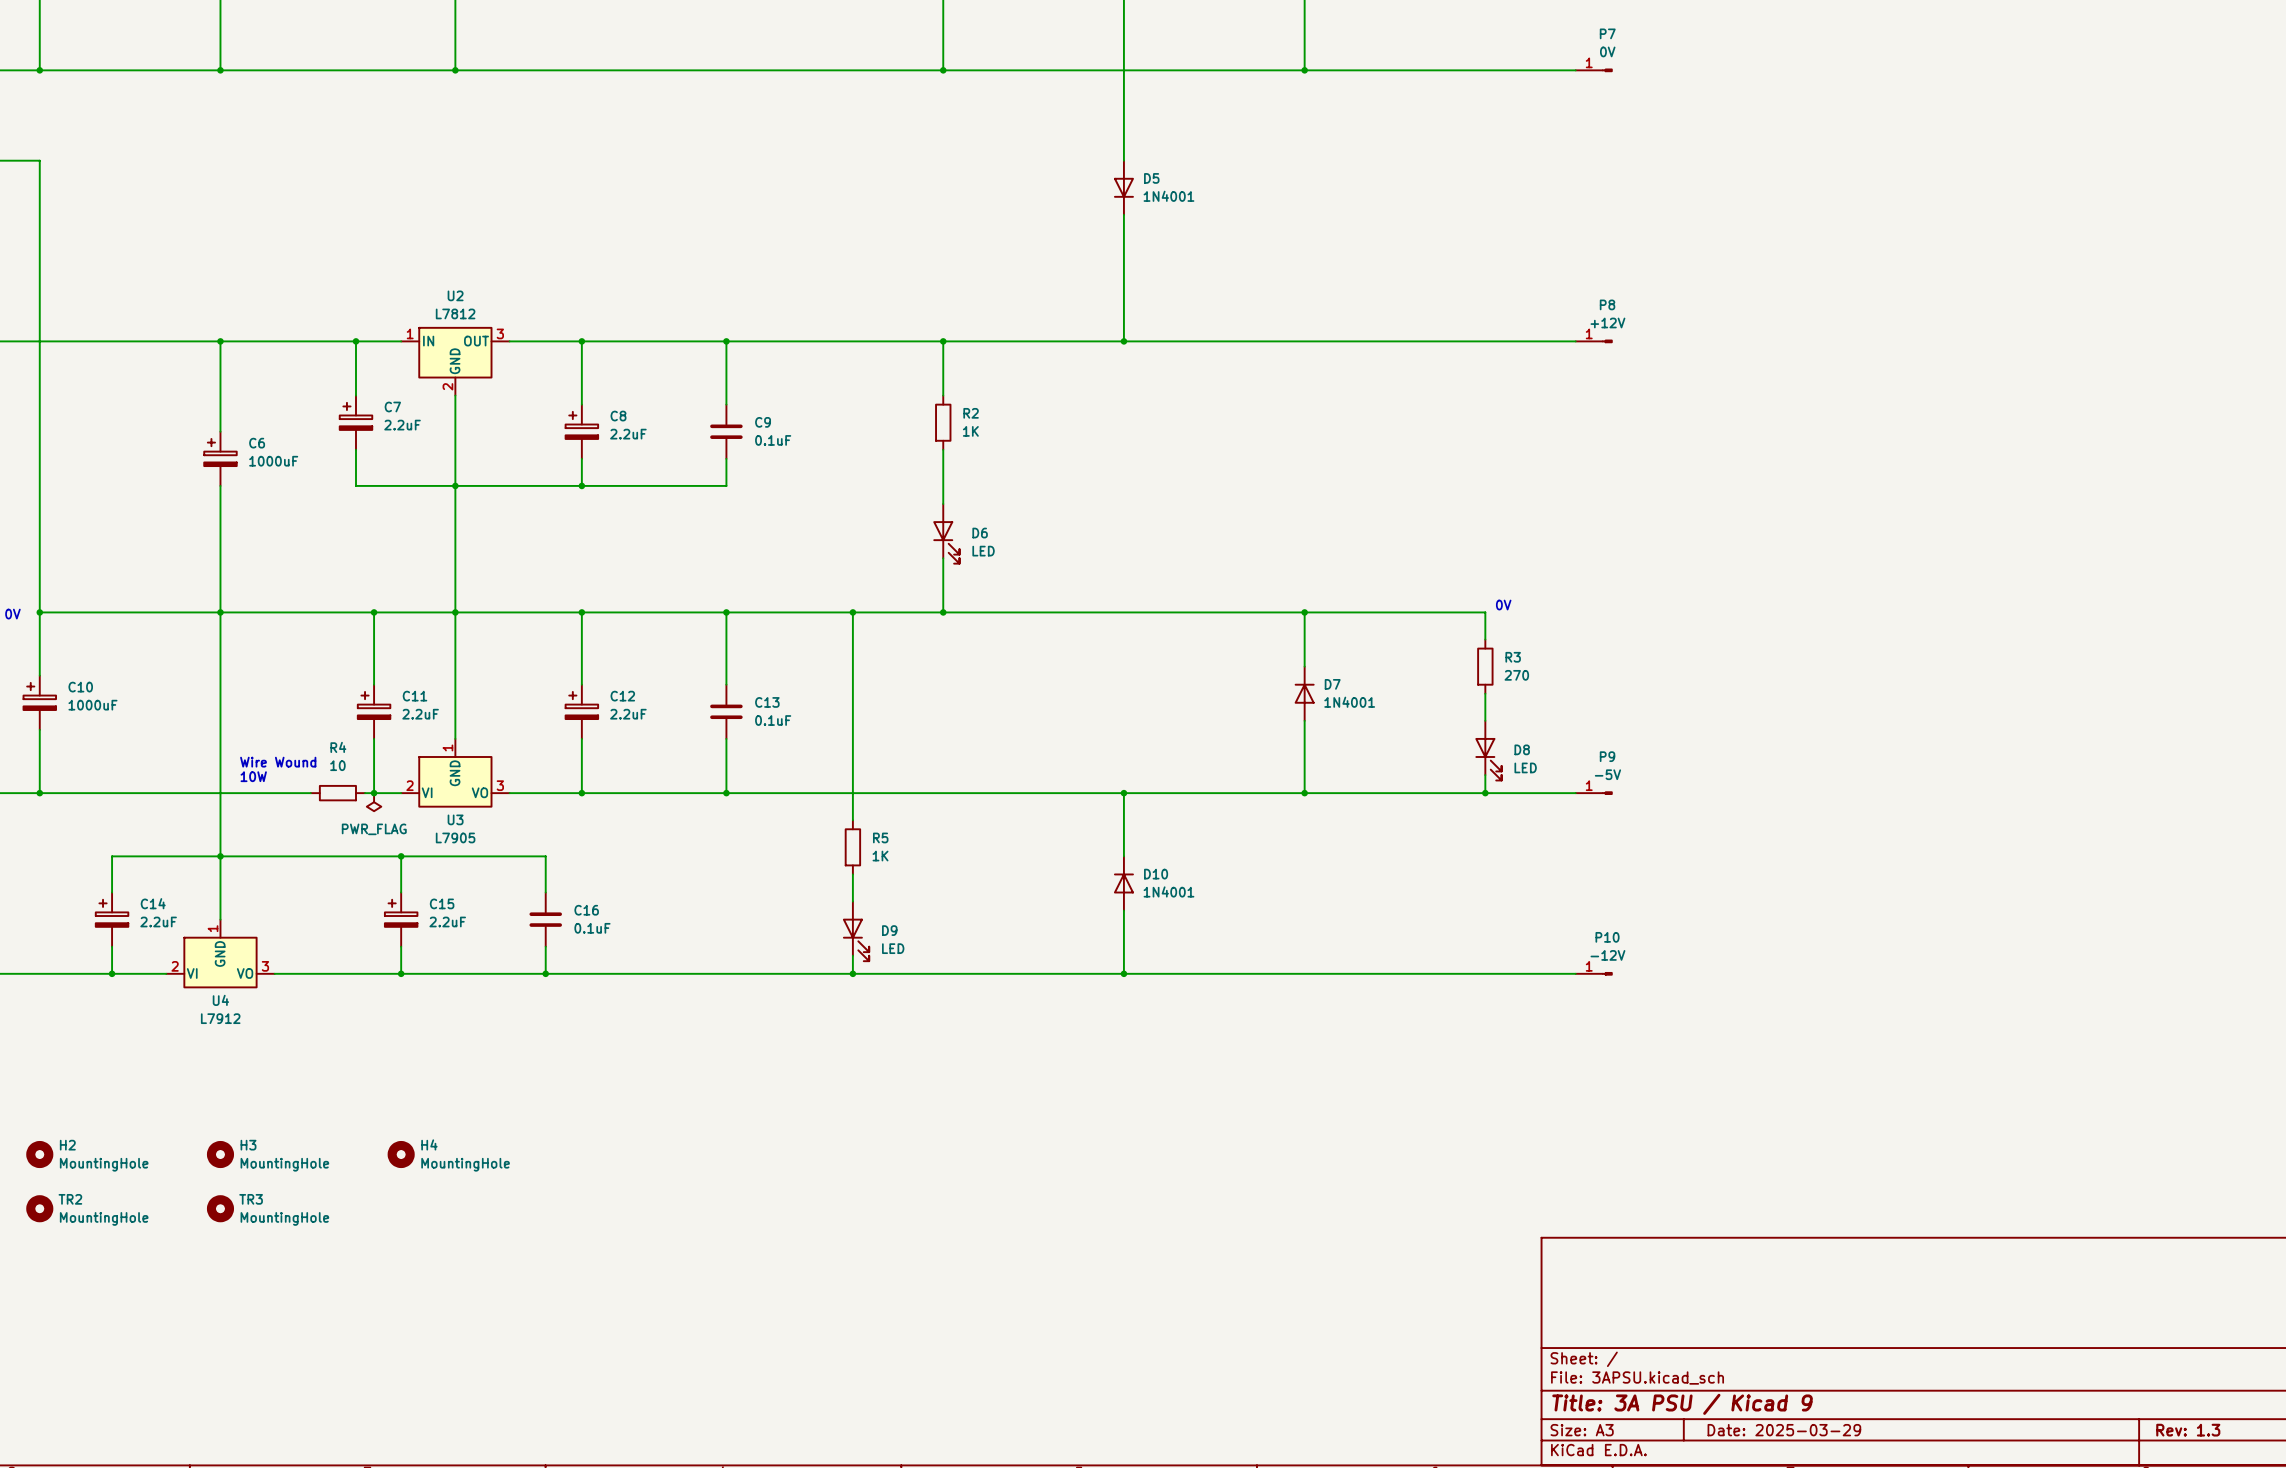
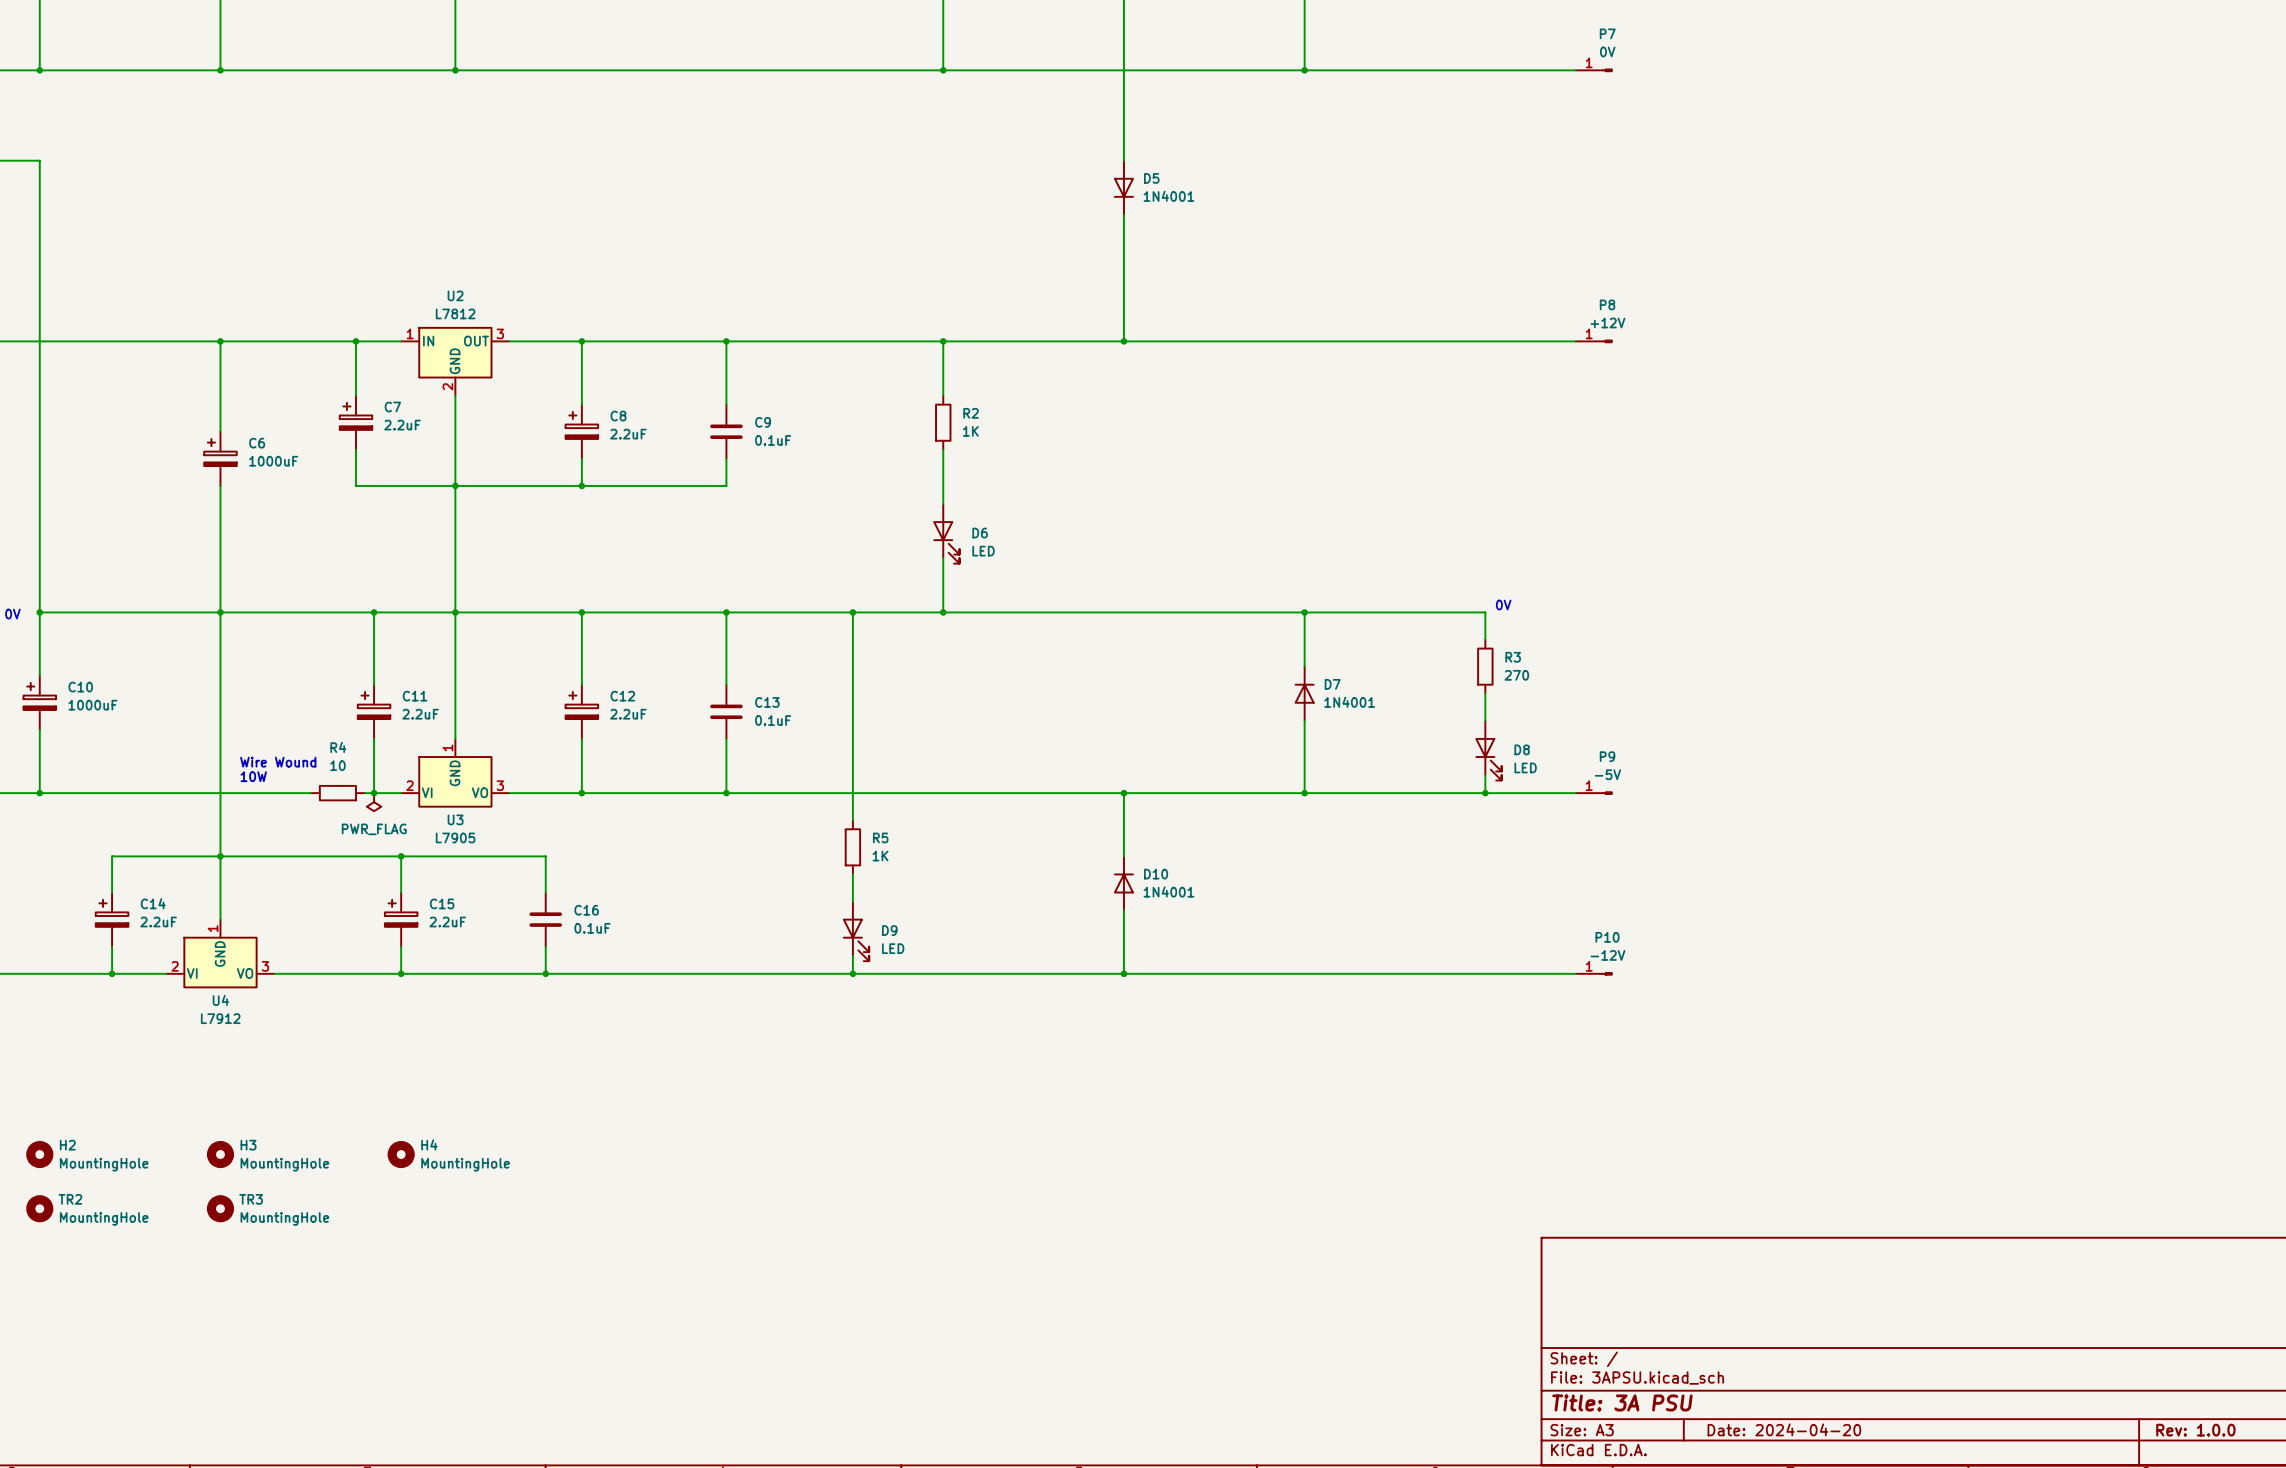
title block: Title: 3A PSU / Kicad 9 (1682, 1404) -> Title: 3A PSU (1622, 1402)
title block: Date: 2025-03-29 (1784, 1430) -> Date: 2024-04-20 (1784, 1429)
title block: Rev: 1.3 (2188, 1430) -> Rev: 1.0.0 (2195, 1430)

